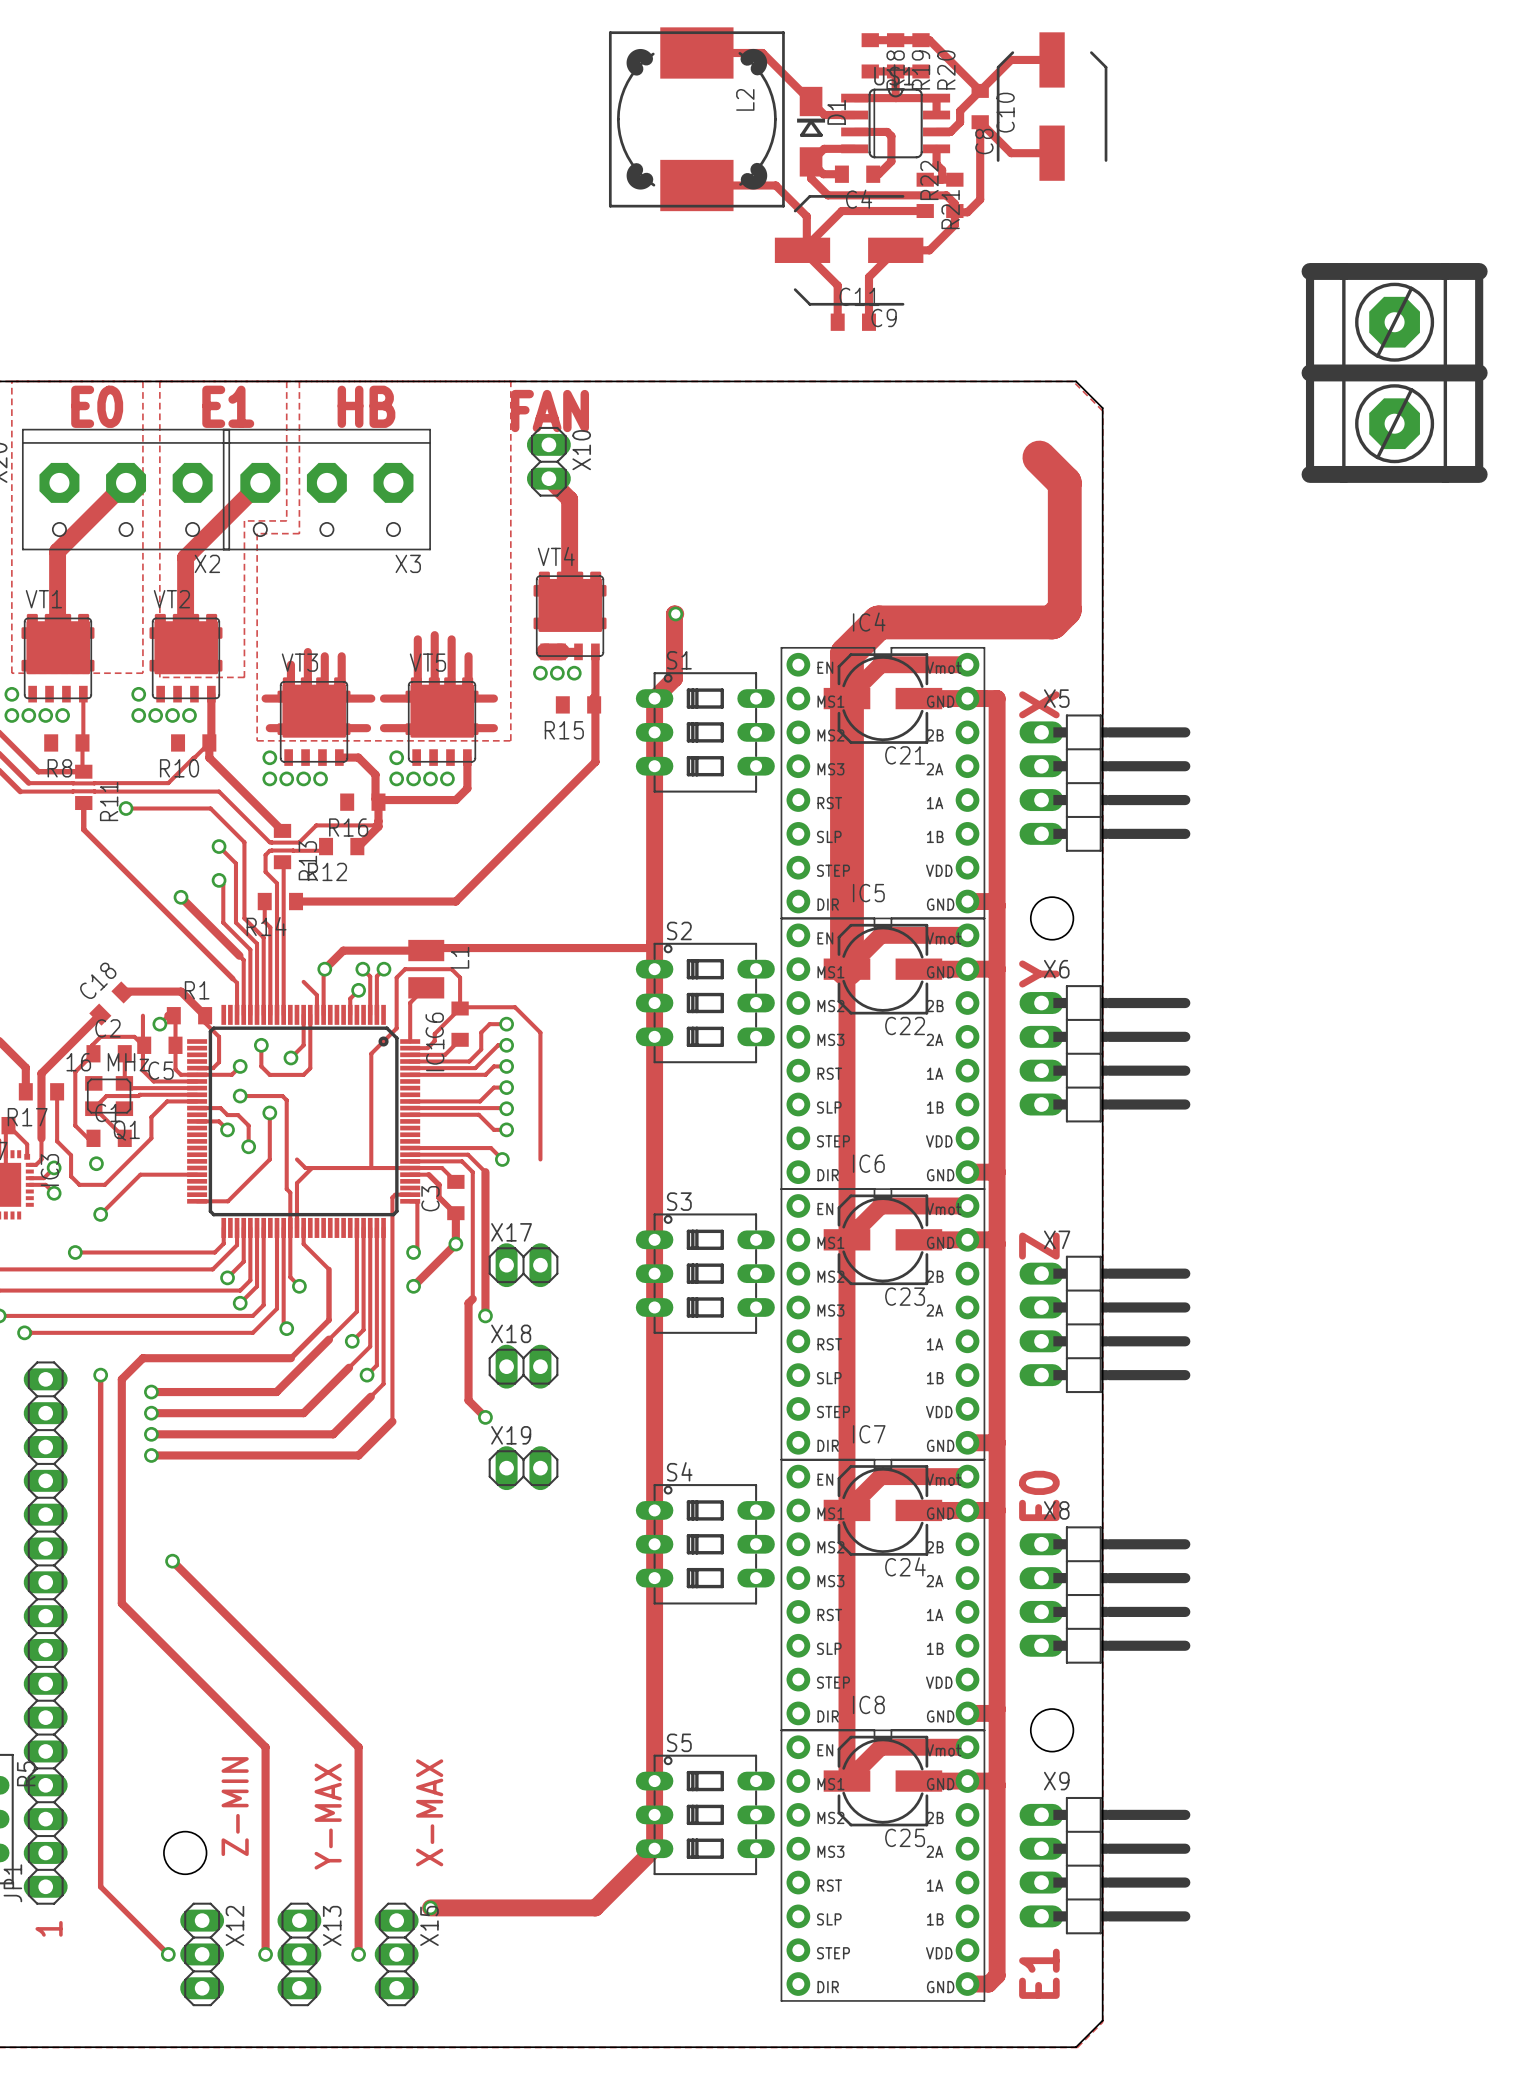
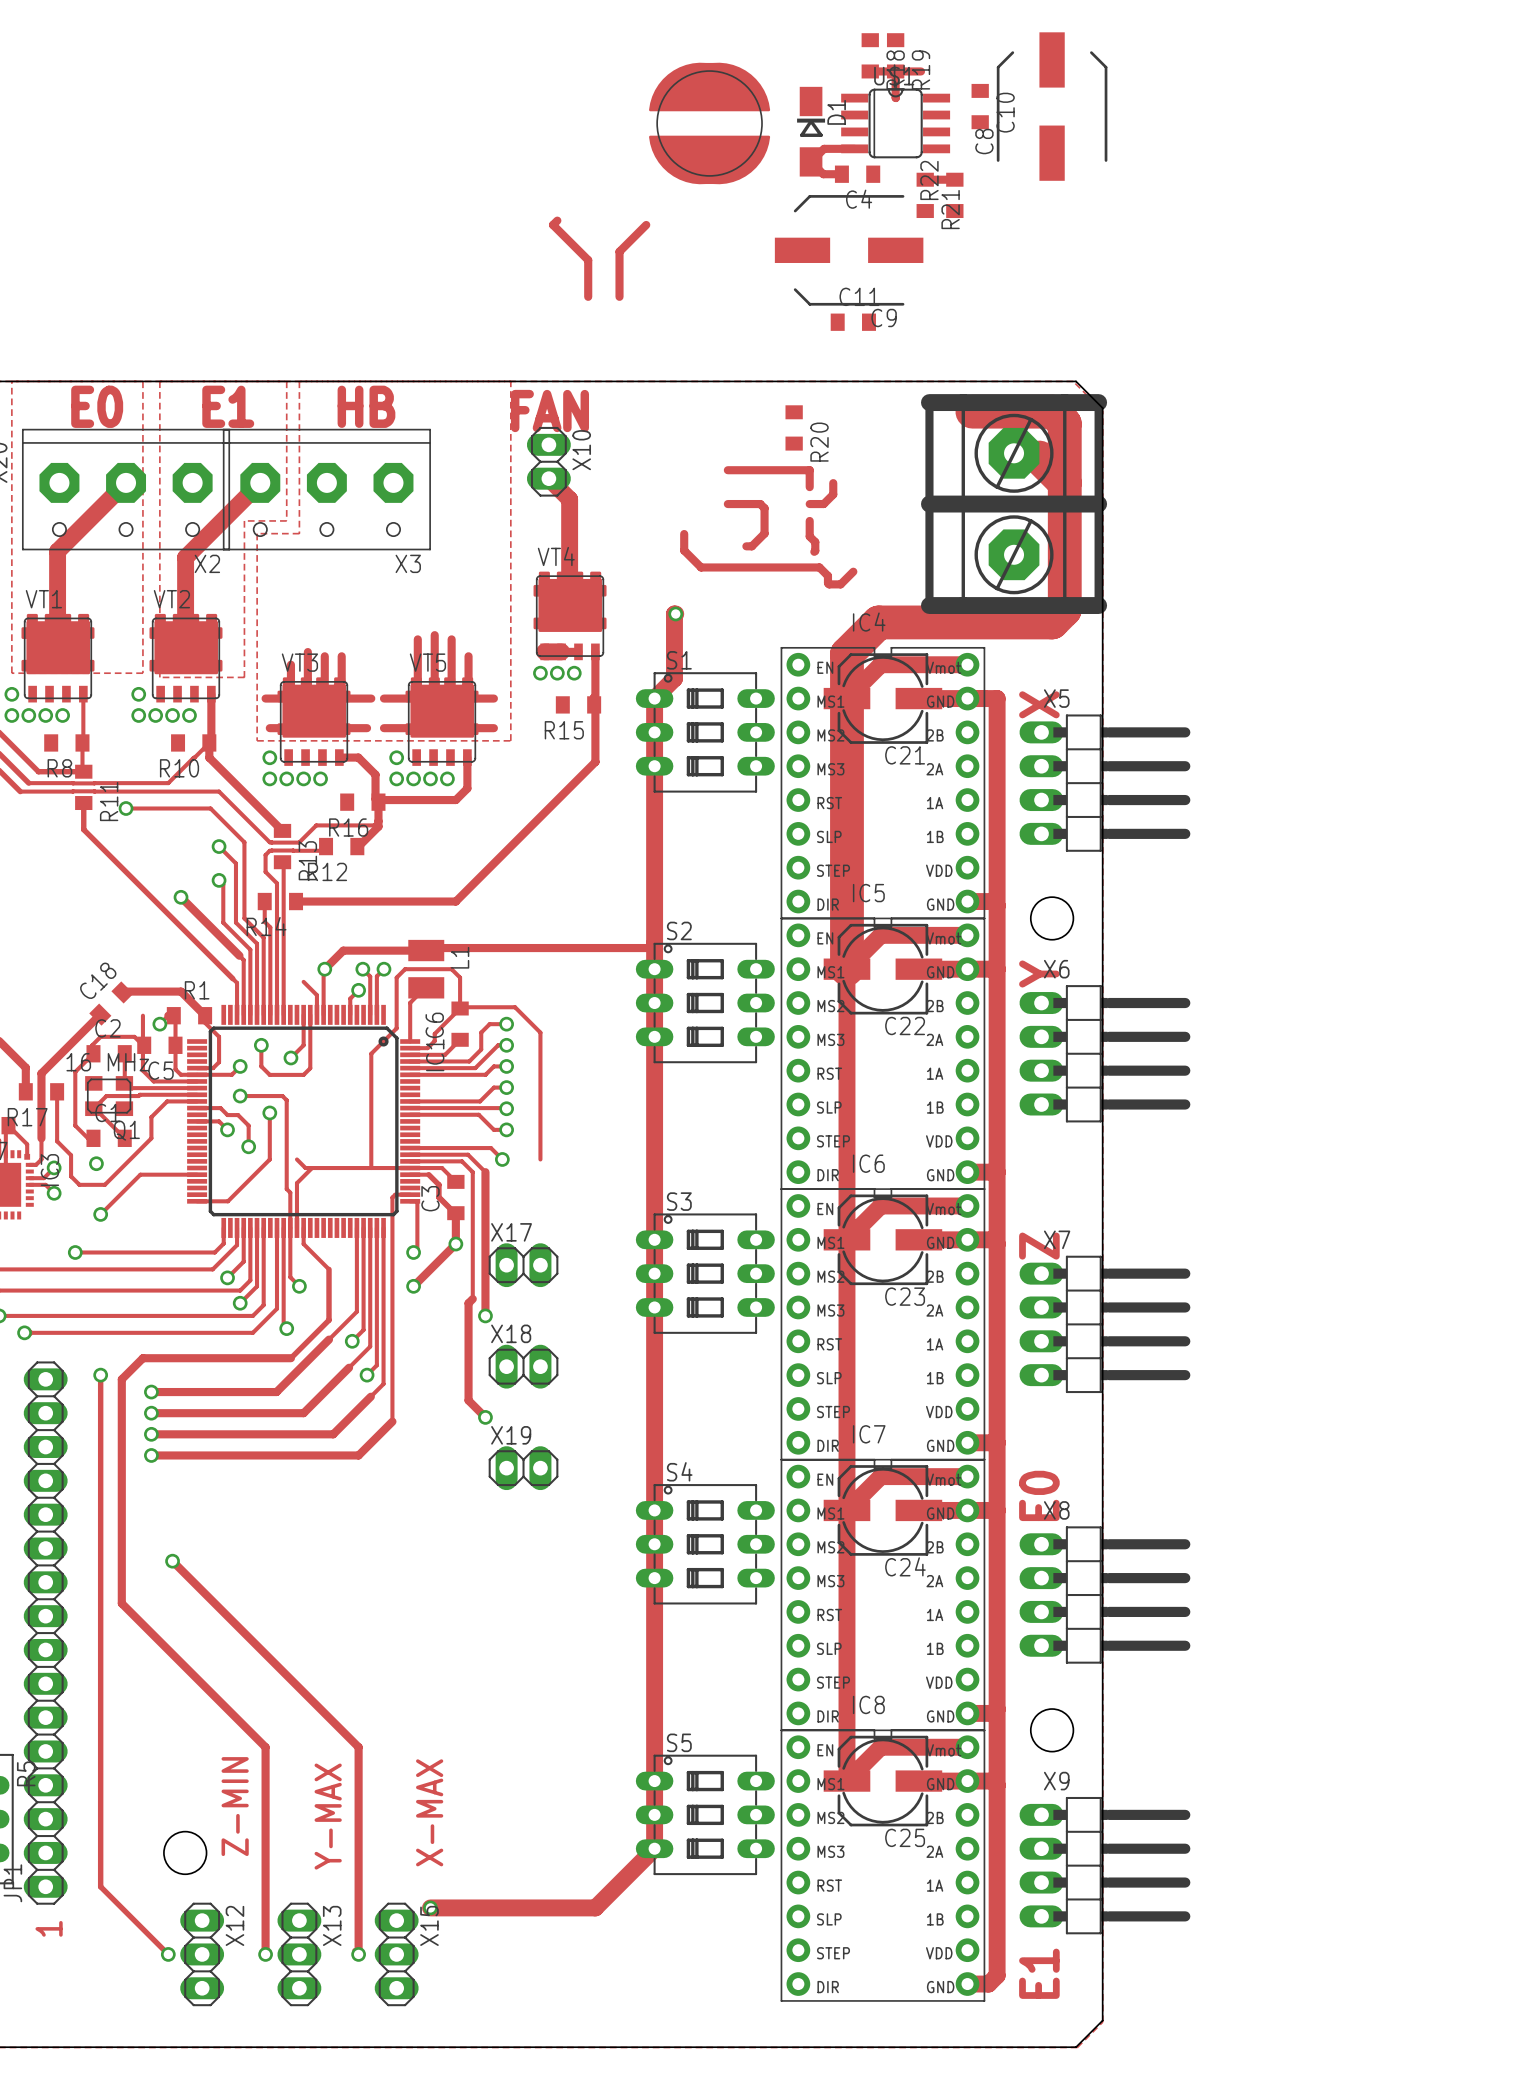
track: (870, 40) (929, 40) (980, 90) -> none
track: (696, 52) (762, 52) (824, 115) (854, 115) -> none
R20 position: (921, 55) -> (794, 427)
track: (1052, 59) (1011, 59) (960, 111) (960, 122) (950, 131) (936, 131) -> none
track: (854, 98) (936, 98) (936, 115) -> none
L2: (696, 119) -> none
part: none -> (709, 123)
track: (854, 131) (887, 131) (891, 136) (891, 161) (878, 174) (873, 174) -> none
track: (936, 148) (936, 164) (942, 169) (941, 179) -> none
track: (1052, 153) (1011, 153) (980, 122) (980, 199) (967, 212) (954, 211) -> none
track: (811, 161) (811, 178) (827, 195) (946, 195) (954, 203) (954, 224) (929, 250) (895, 250) (868, 277) (868, 322) -> none
track: (696, 185) (775, 185) (806, 216) (806, 246) -> none
track: (925, 211) (841, 211) (802, 250) (837, 285) (837, 322) -> none
track: none -> (557, 220) (553, 224) (588, 260) (588, 296)
track: none -> (646, 224) (619, 251) (619, 296)
part: (1394, 372) -> none
track: none -> (972, 411) (1052, 411) (1064, 423) (1064, 482)
track: none -> (727, 470) (809, 470) (809, 487)
track: none -> (833, 483) (833, 494) (823, 504) (809, 504)
track: none -> (727, 504) (760, 504) (764, 508) (764, 533) (751, 546) (746, 546)
part: none -> (1014, 504)
track: none -> (809, 520) (809, 536) (815, 542) (814, 551)
track: none -> (684, 534) (684, 550) (701, 567) (819, 567) (827, 575) (829, 584) (840, 584) (853, 571)

